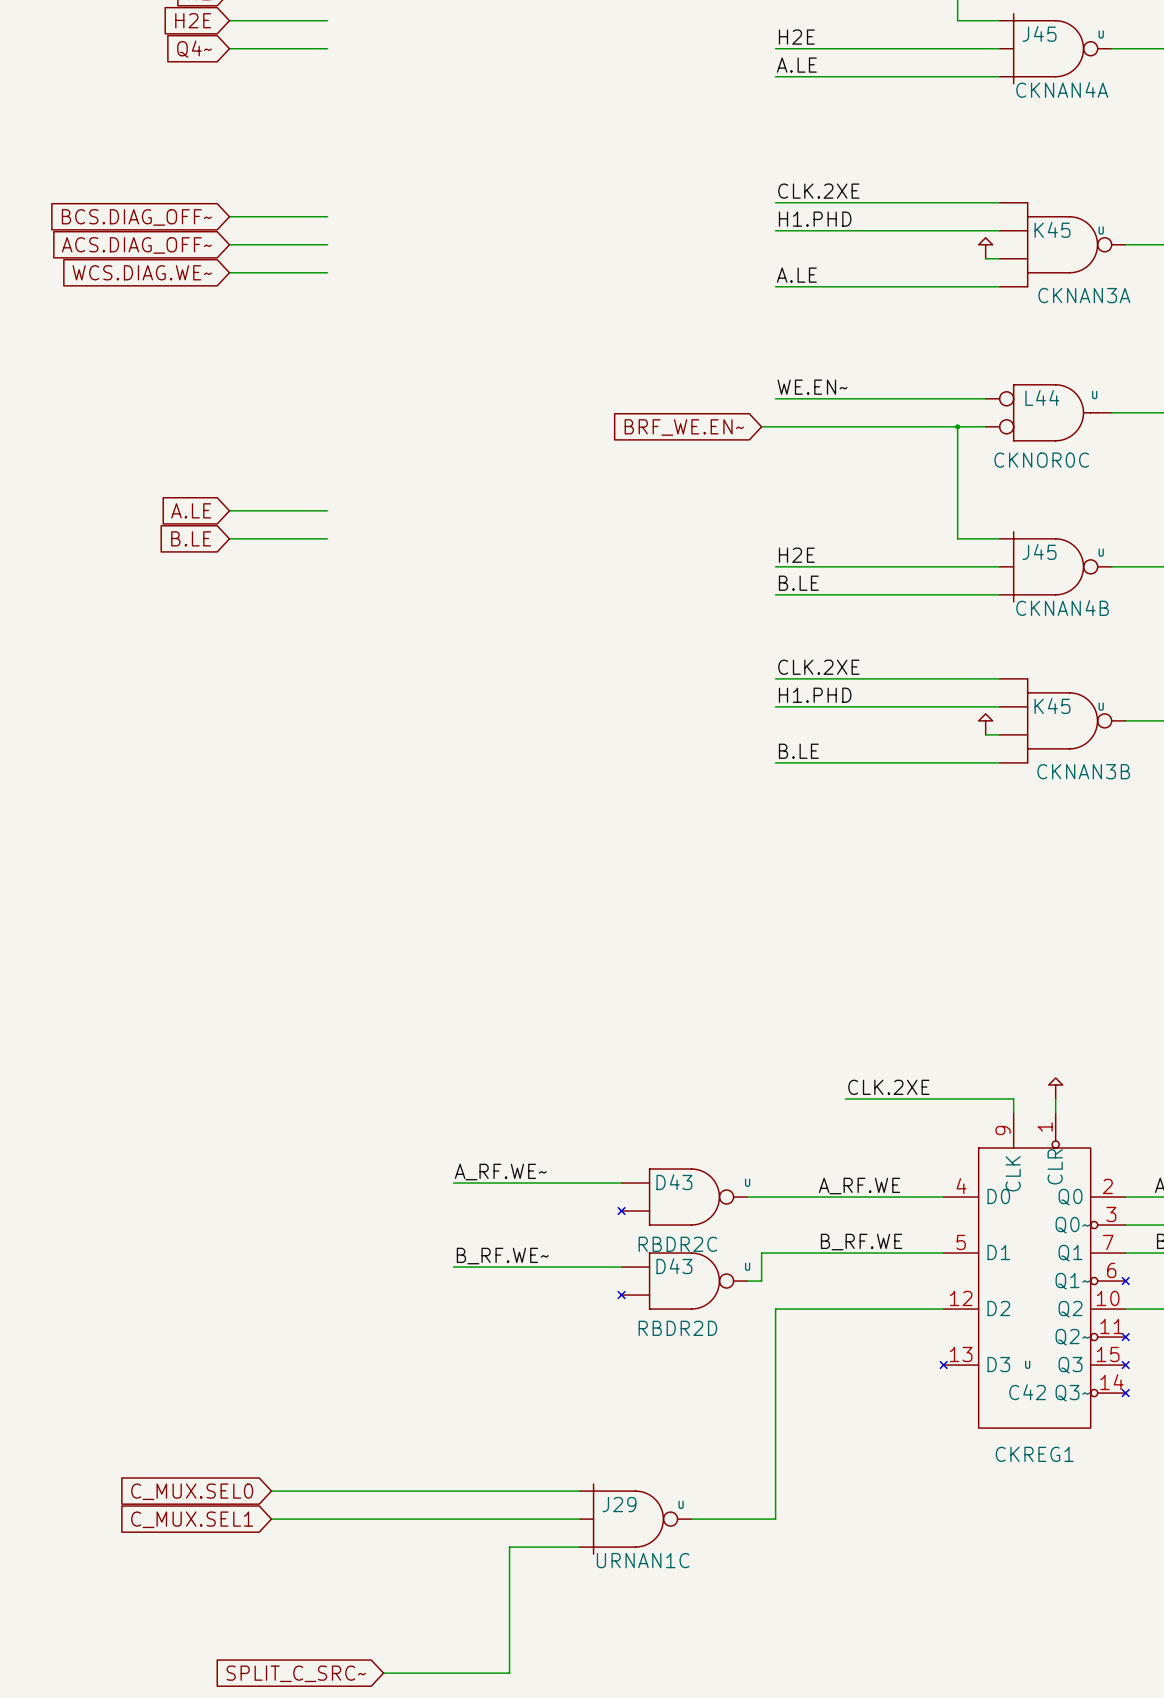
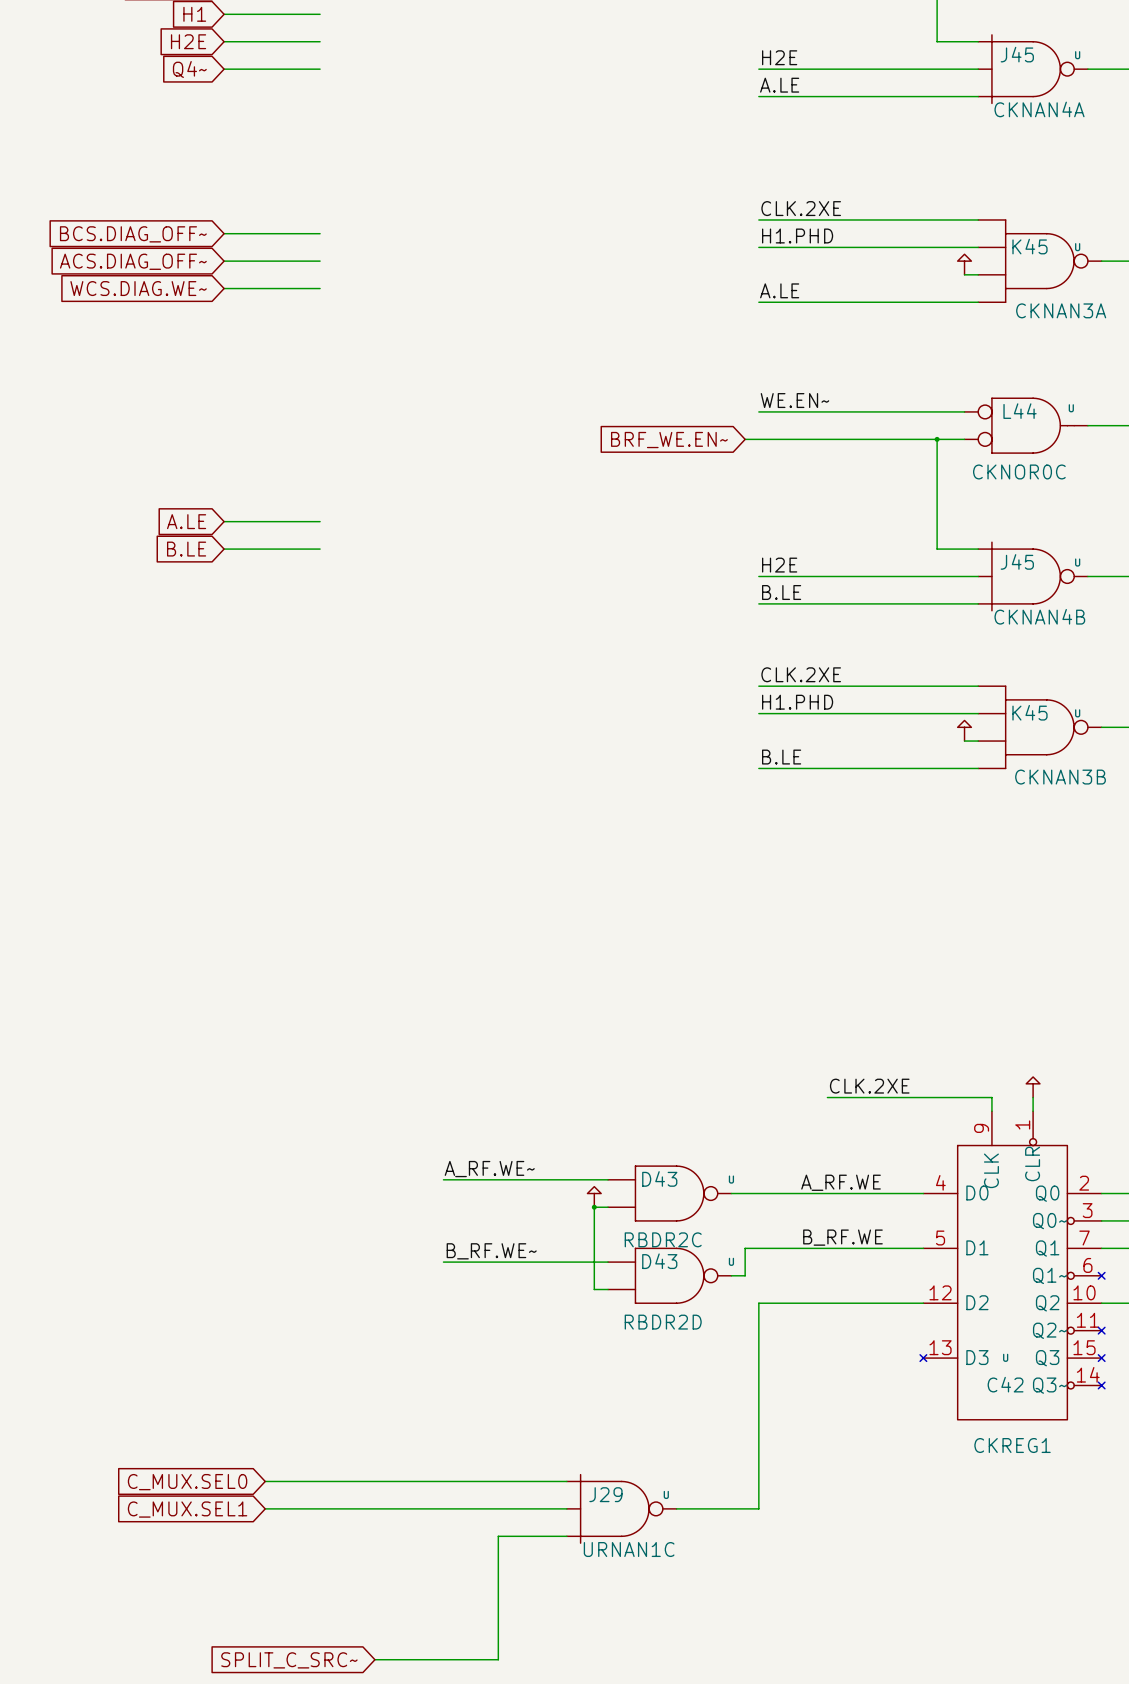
power symbol: none -> (594, 1196)
junction: none -> (594, 1207)
wire: none -> (608, 1207) (594, 1207) (594, 1289) (608, 1289)
no-connect mark: (621, 1211) -> none
no-connect mark: (621, 1295) -> none

